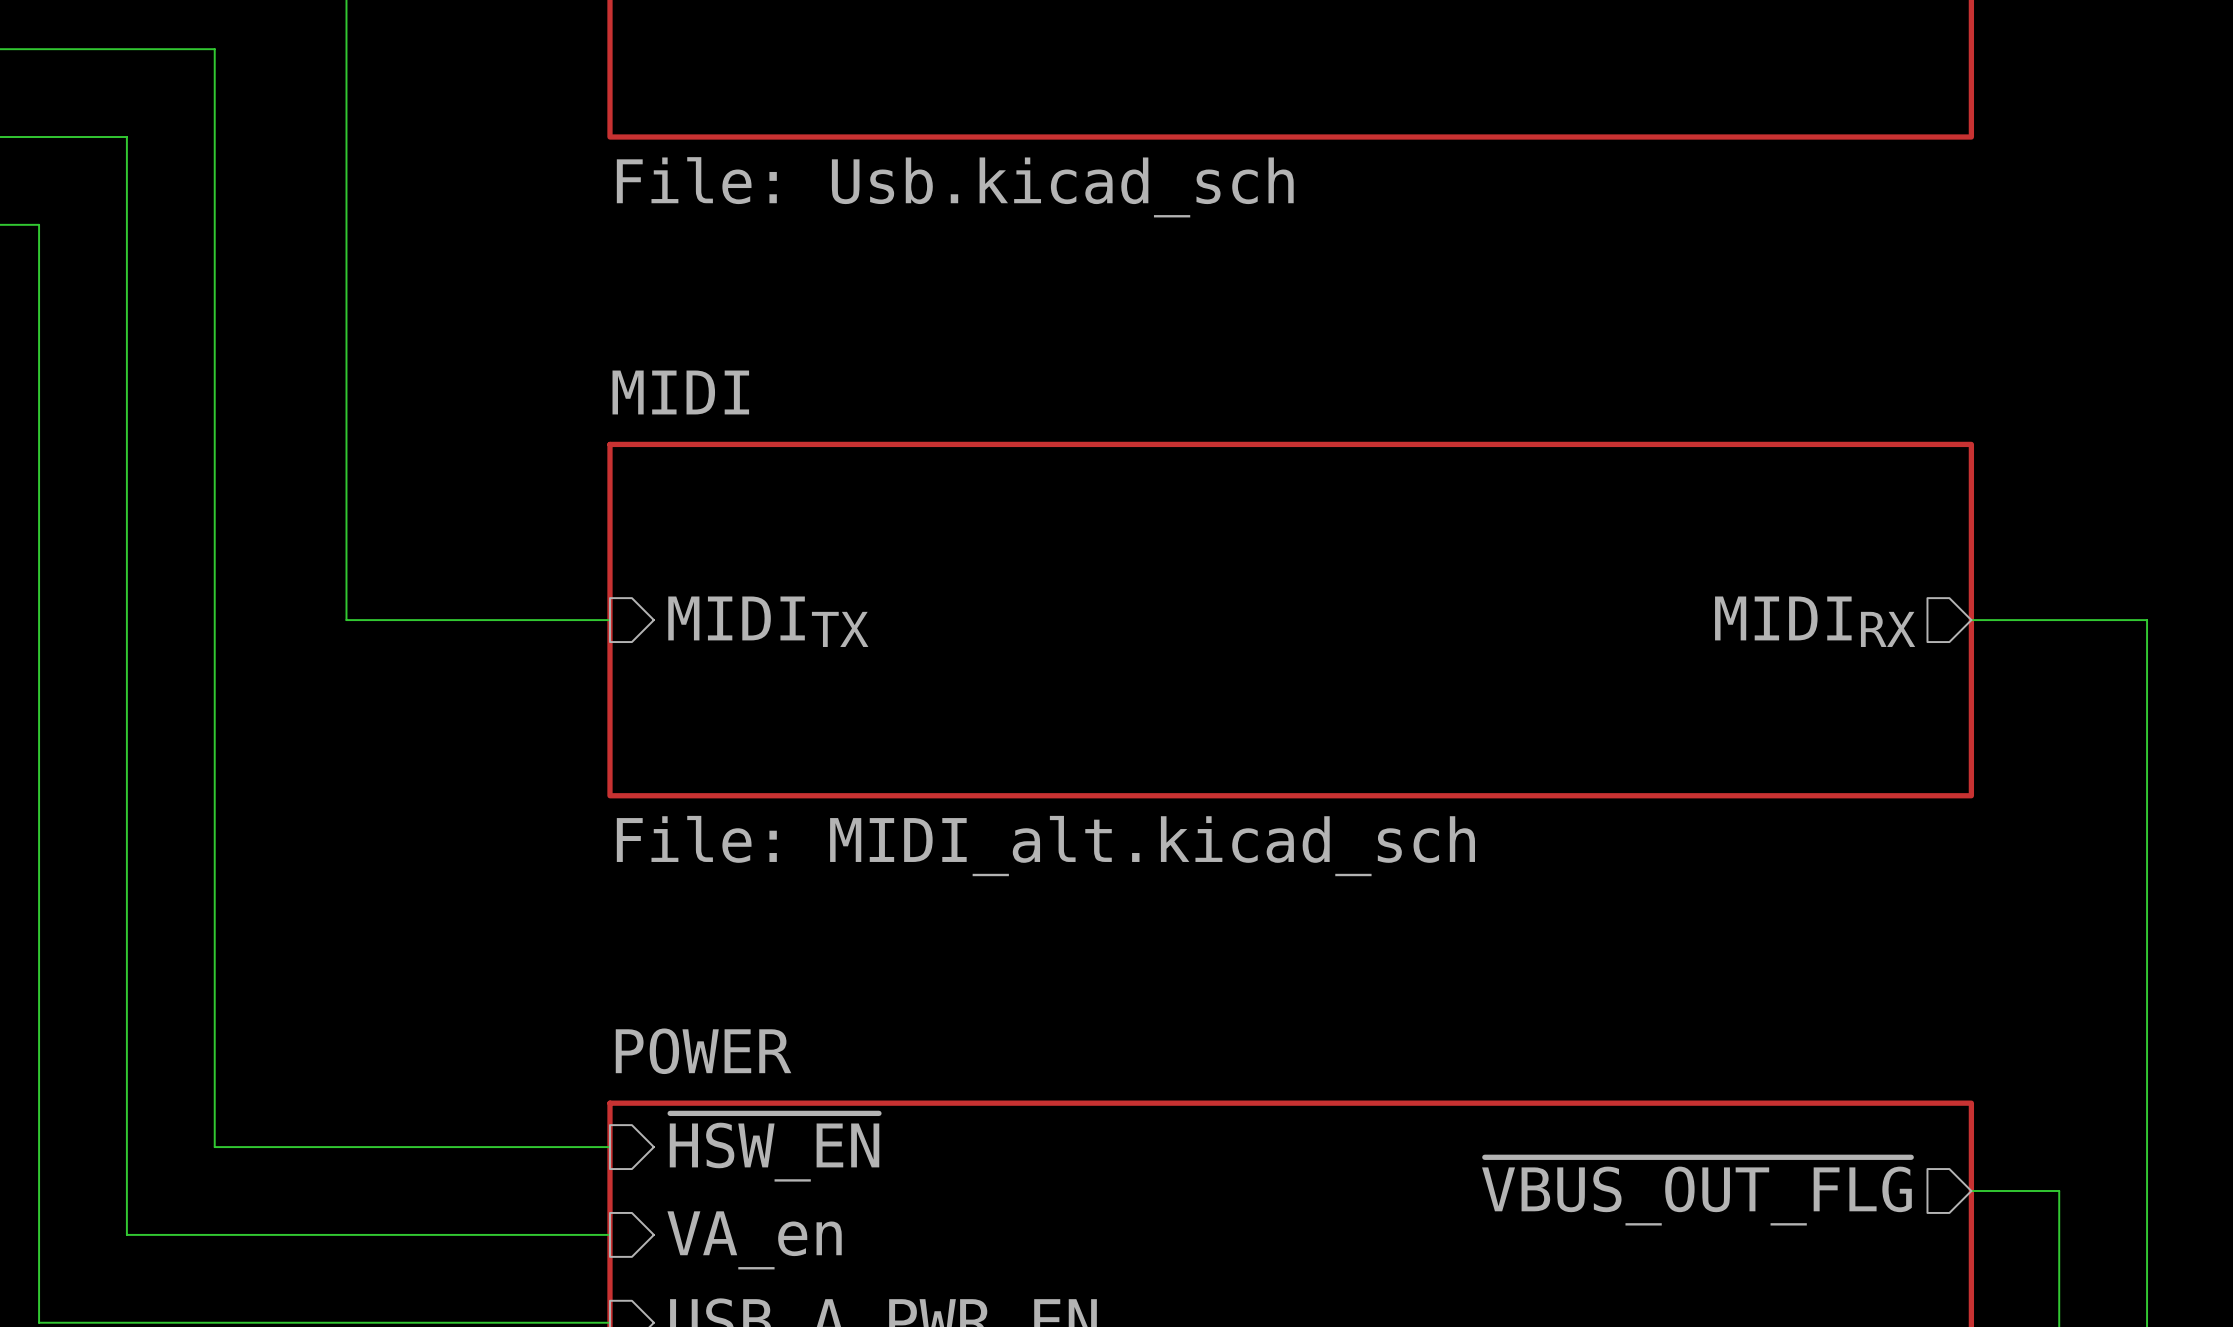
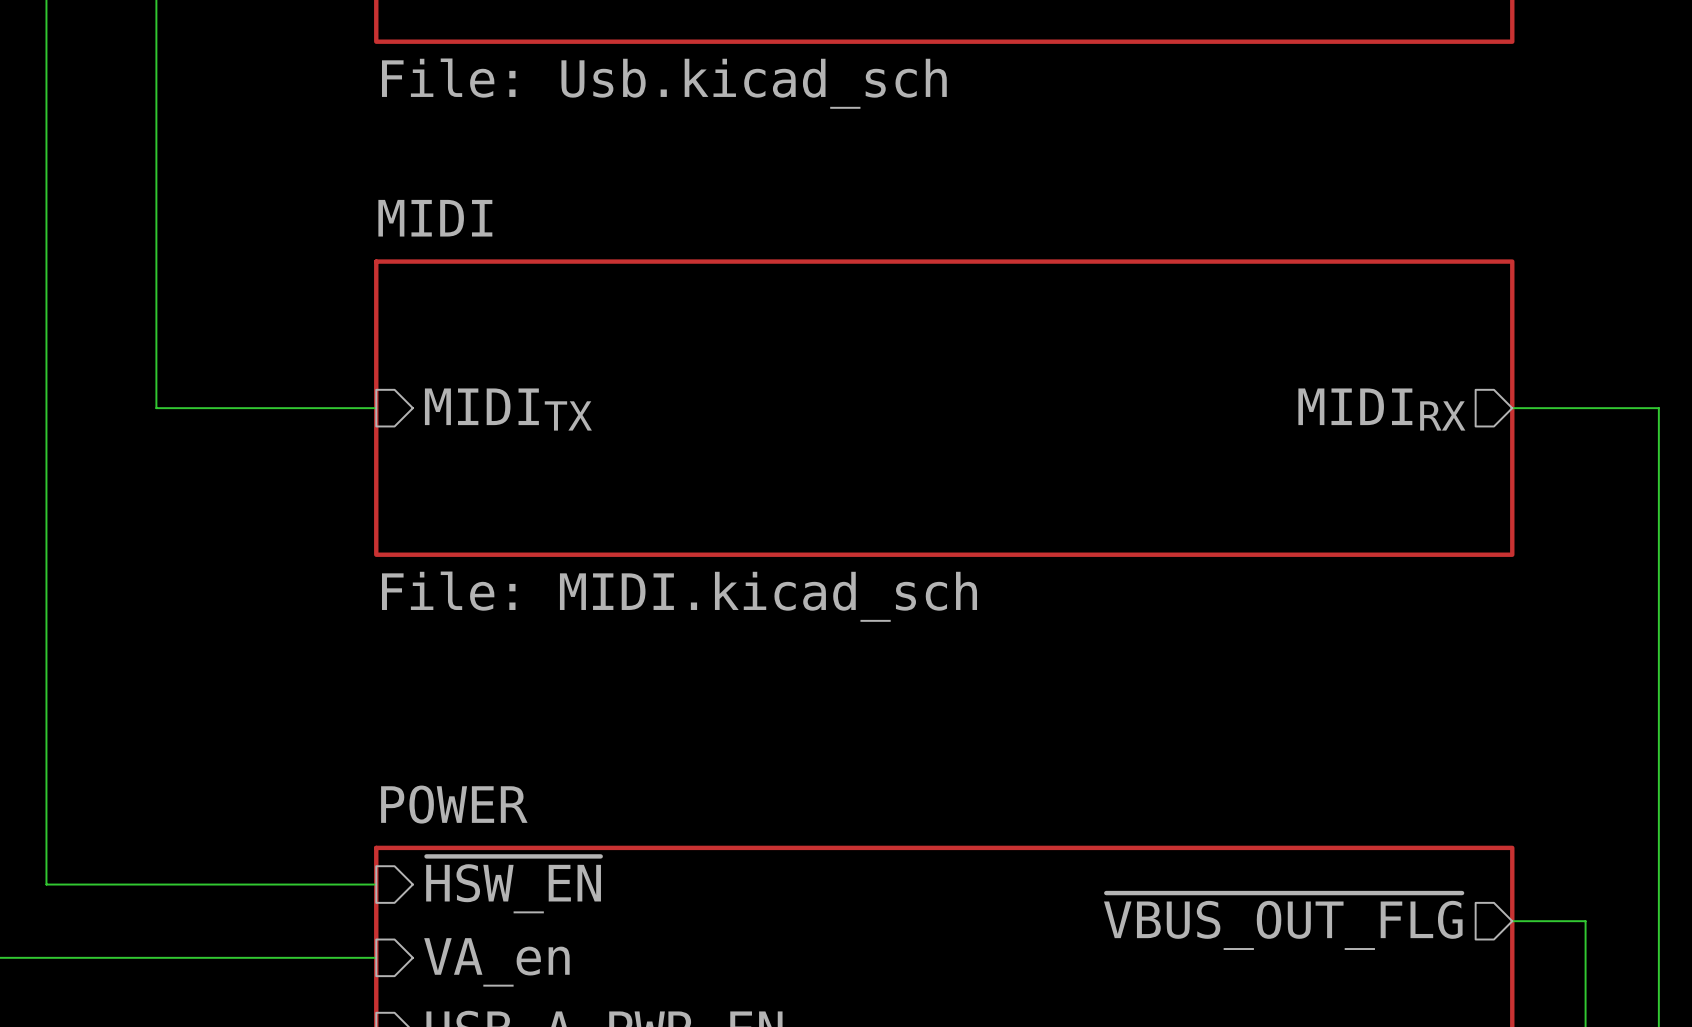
wire: (346, 576) (346, 620) (609, 620) -> (156, 408) (376, 408)
sheet MIDI: none -> File: MIDI.kicad_sch (944, 408)
sheet MIDI: File: MIDI_alt.kicad_sch (1290, 620) -> none
wire: (1971, 620) (2147, 620) -> (1512, 408) (1658, 408) (1658, 444)
sheet pin position: MIDITX (768, 621) -> MIDITX (508, 409)
sheet pin position: MIDIRX (1815, 621) -> MIDIRX (1381, 409)

